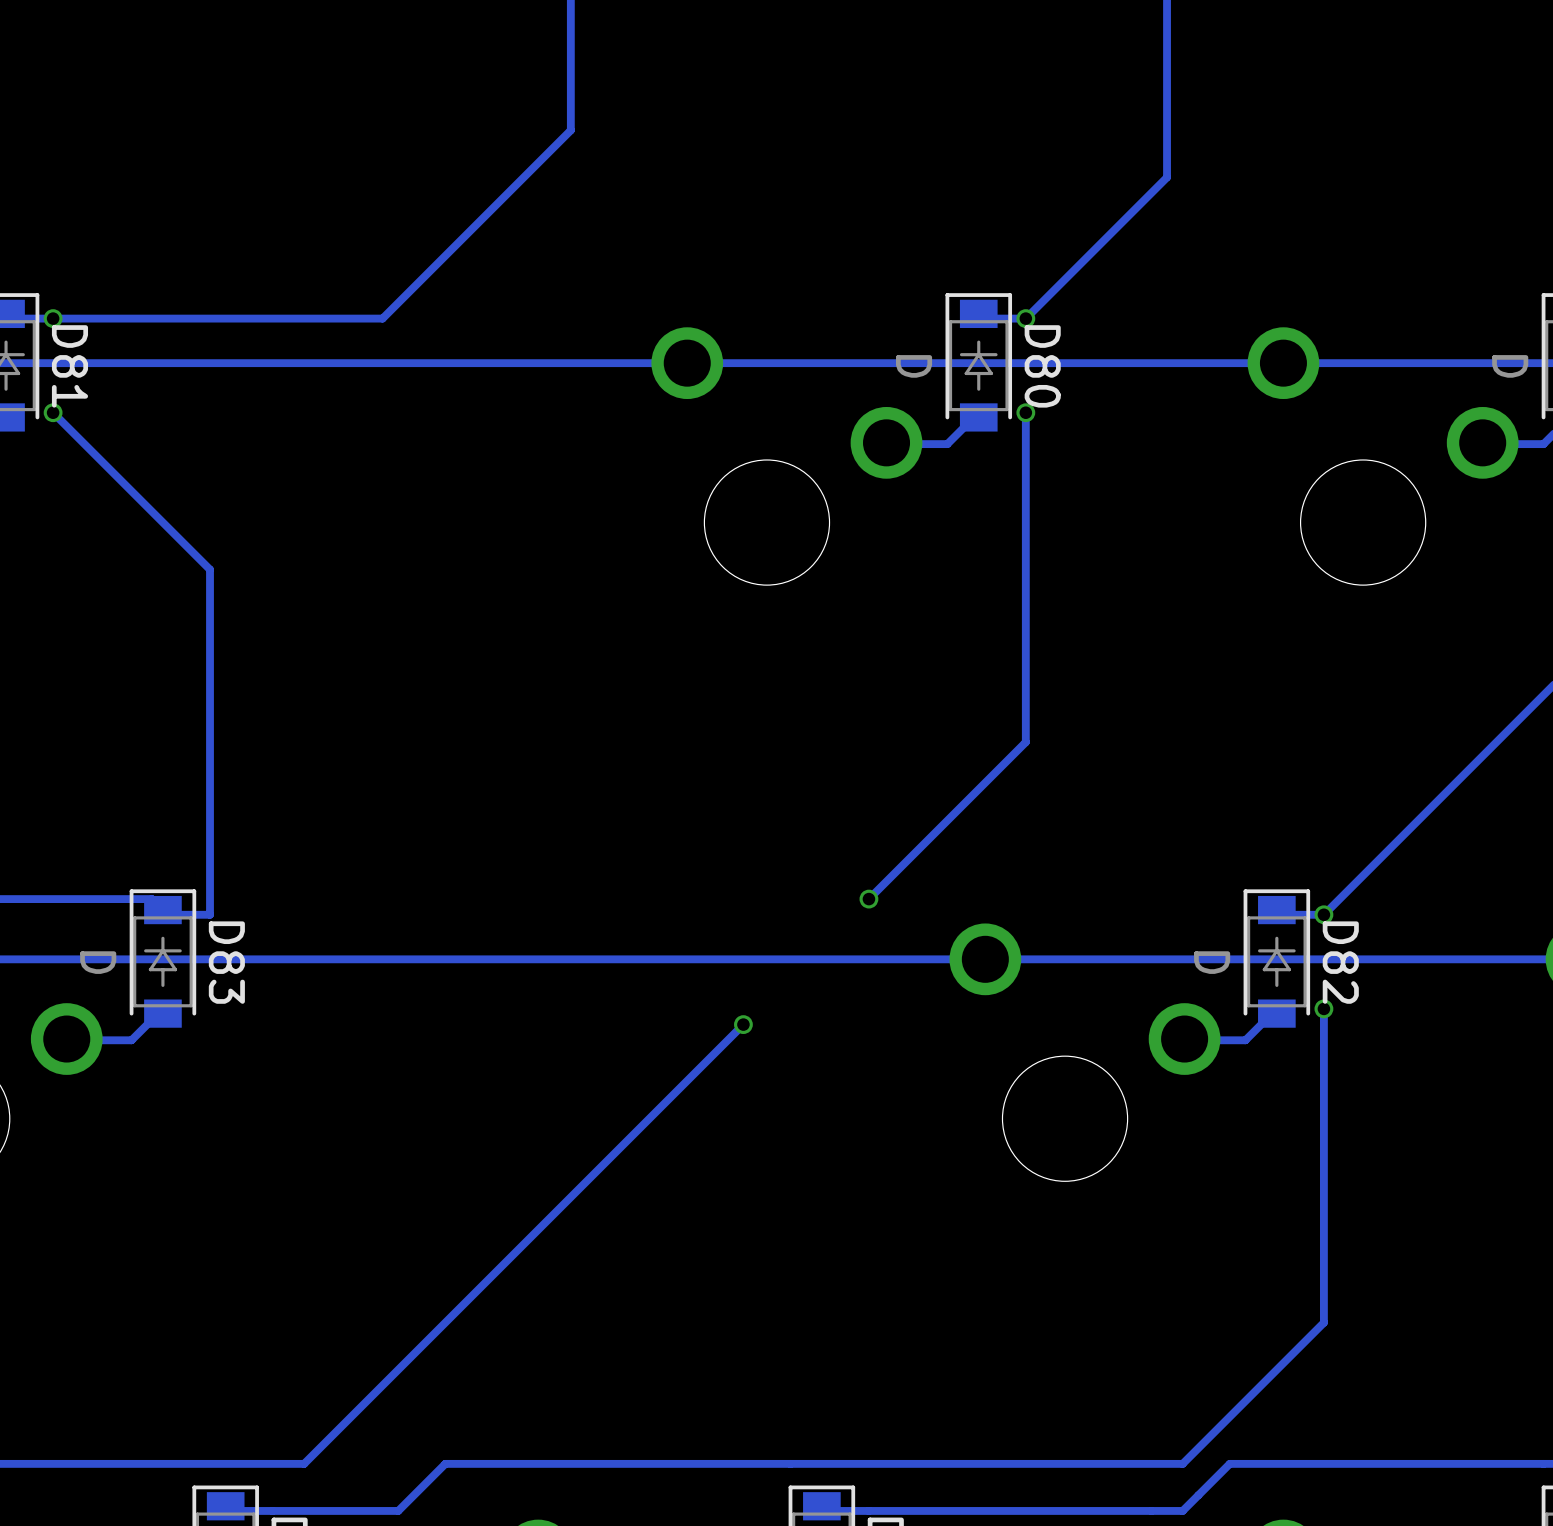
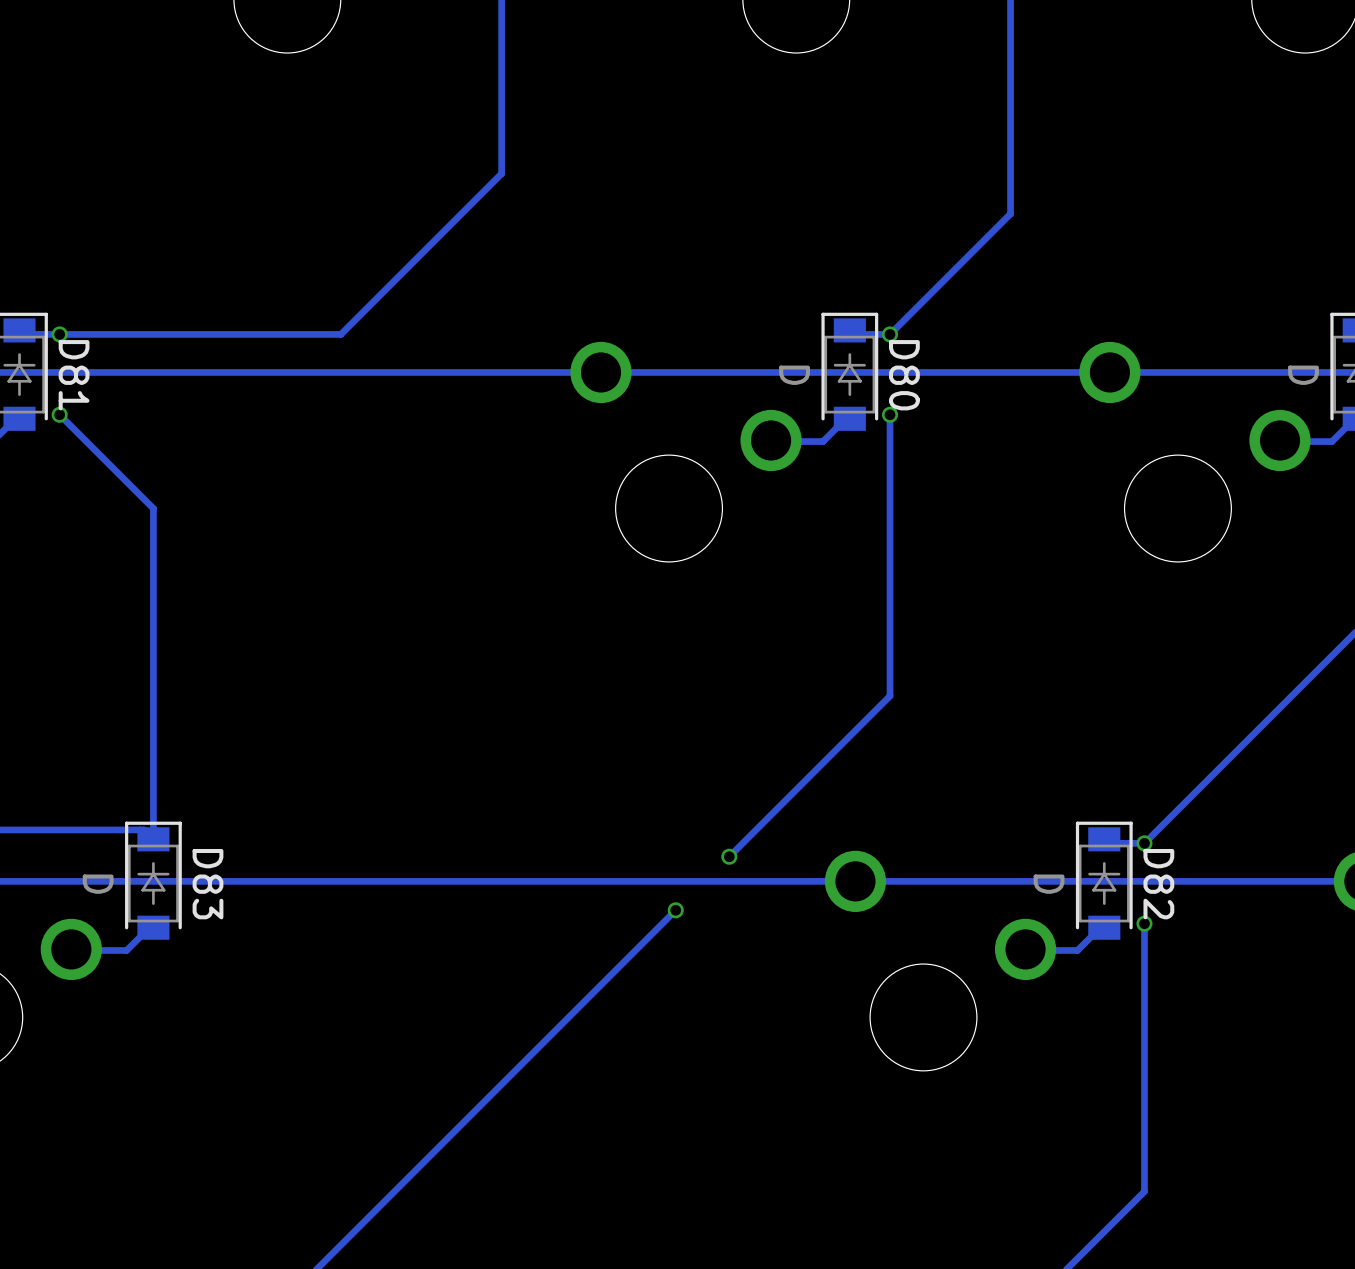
track: (162, 522) (210, 569) (210, 914) (178, 914) (173, 910) -> (153, 508) (153, 839) (142, 839)
track: none -> (756, 829) (729, 856)
via position: (868, 899) -> (729, 856)
track: none -> (675, 910) (648, 937)
via position: (743, 1024) -> (675, 910)

